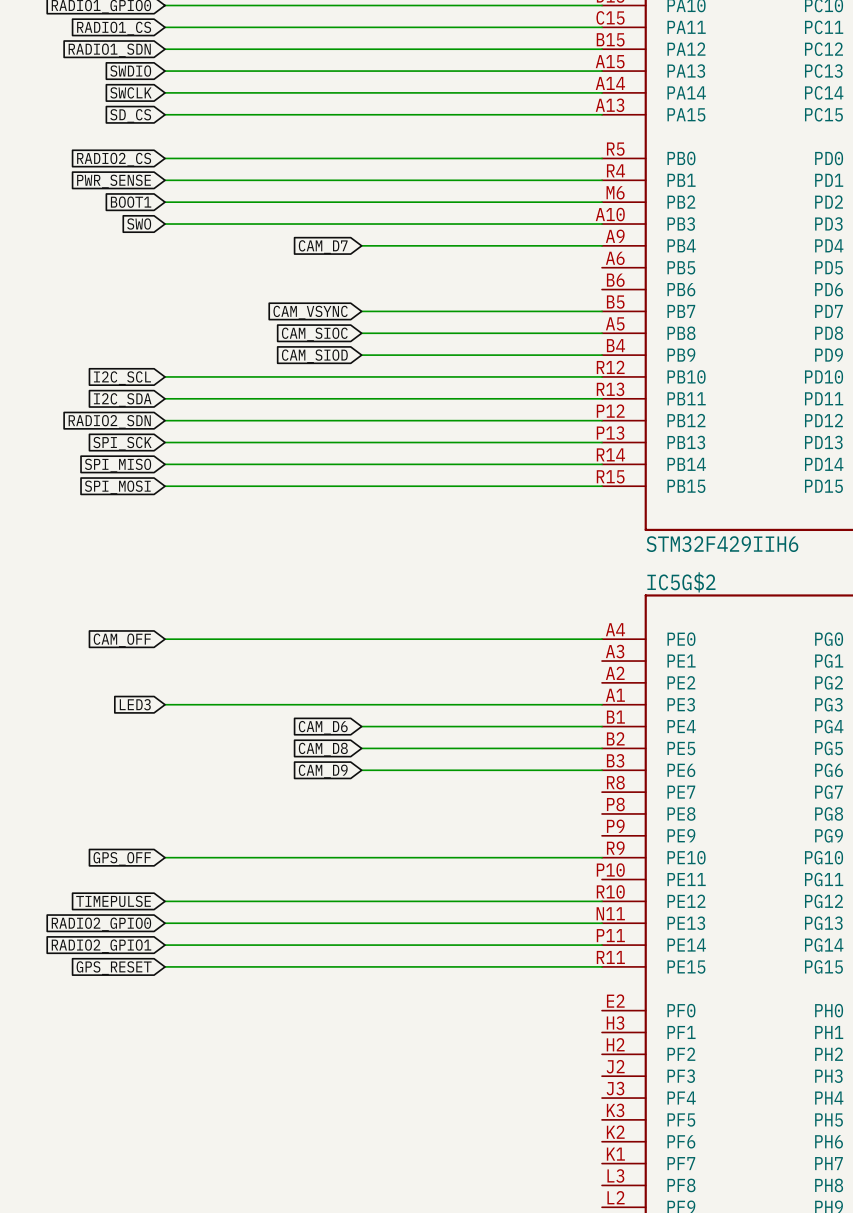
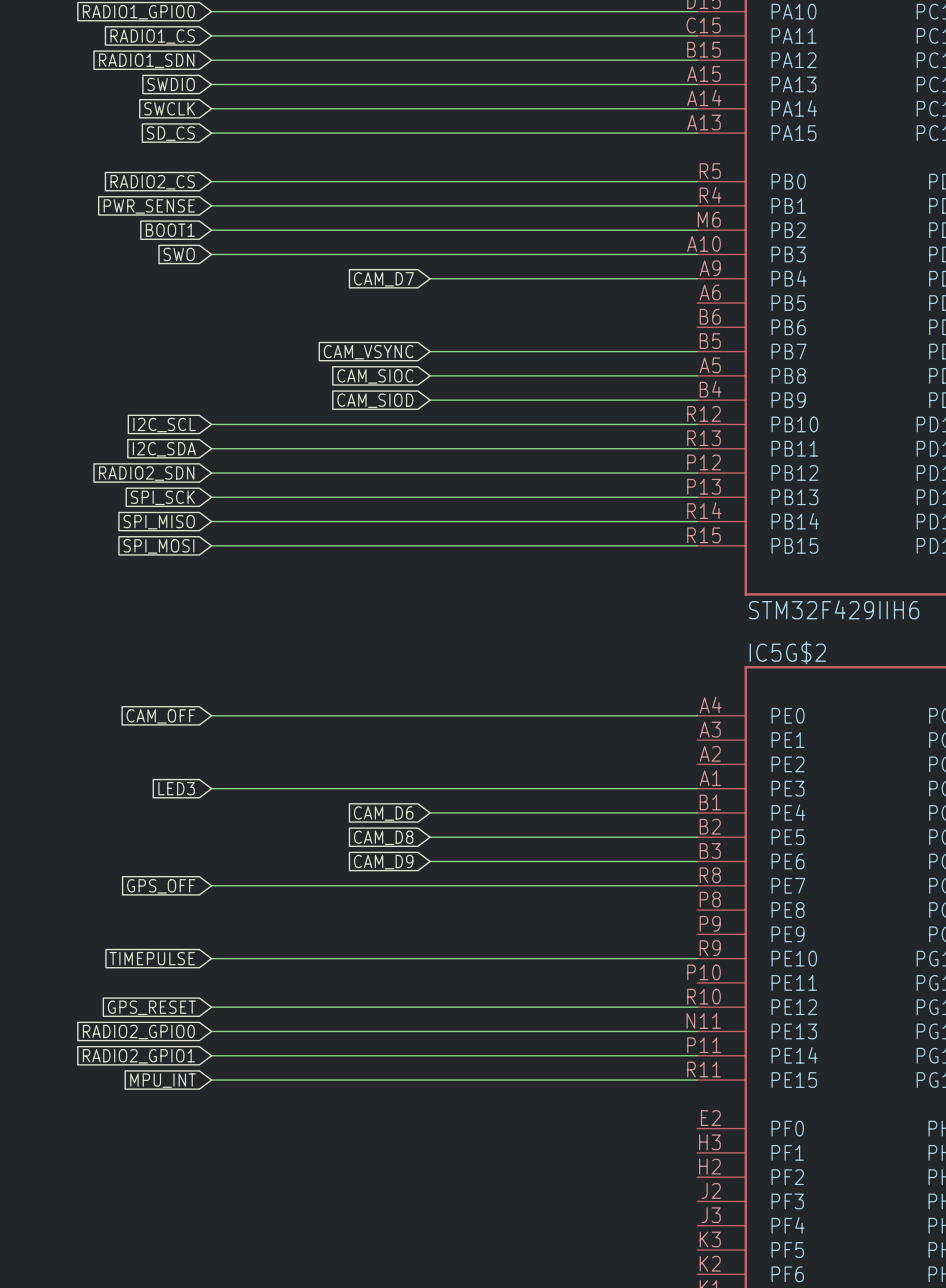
wire: none -> (211, 885) (697, 885)
global label: none -> GPS_OFF (161, 886)
global label: GPS_OFF (122, 858) -> TIMEPULSE (152, 958)
global label: TIMEPULSE (113, 901) -> GPS_RESET (151, 1007)
global label: GPS_RESET (114, 968) -> MPU_INT (163, 1080)

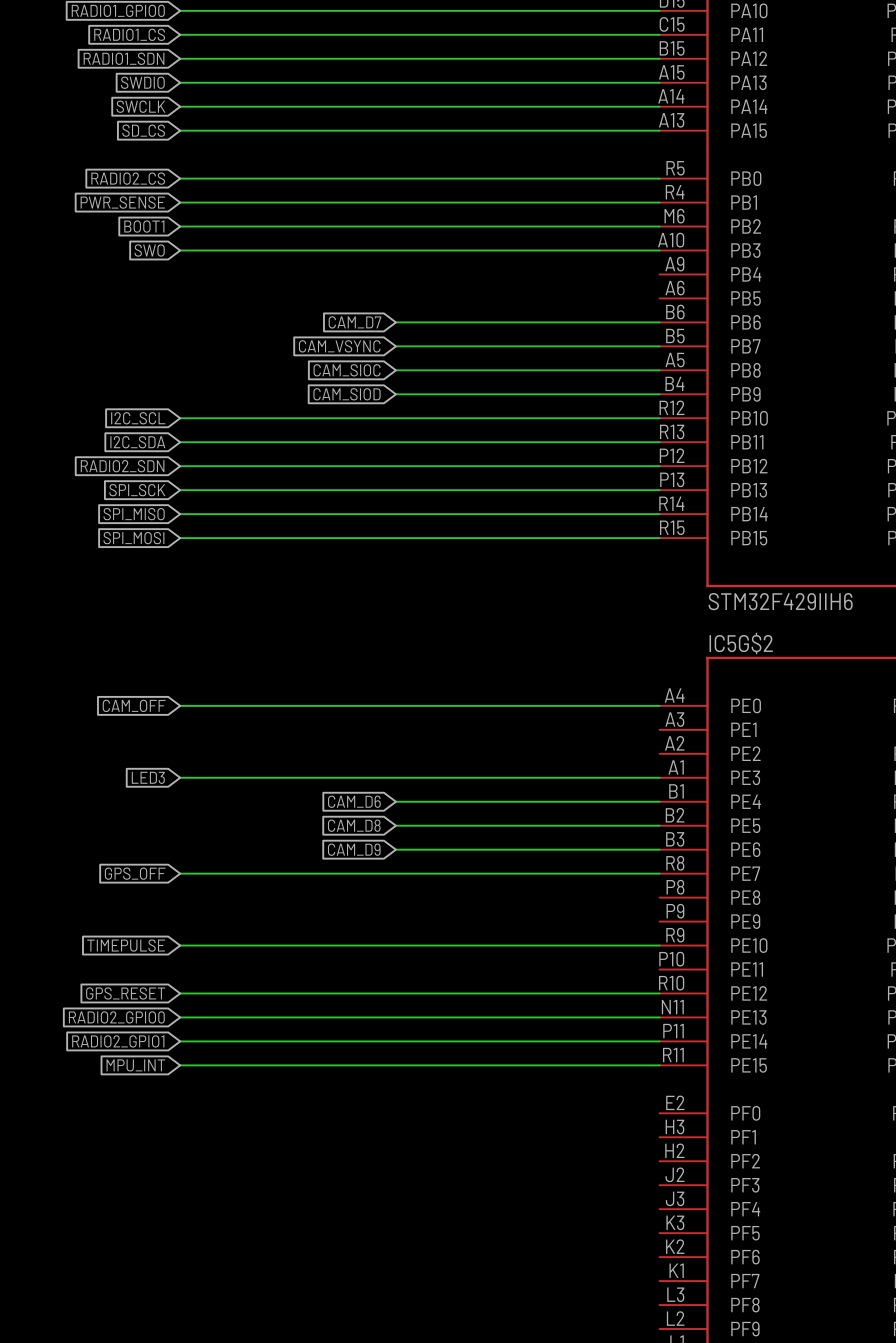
wire: (430, 278) (697, 278) -> (395, 322) (659, 322)
global label position: CAM_D7 (383, 279) -> CAM_D7 (354, 322)

